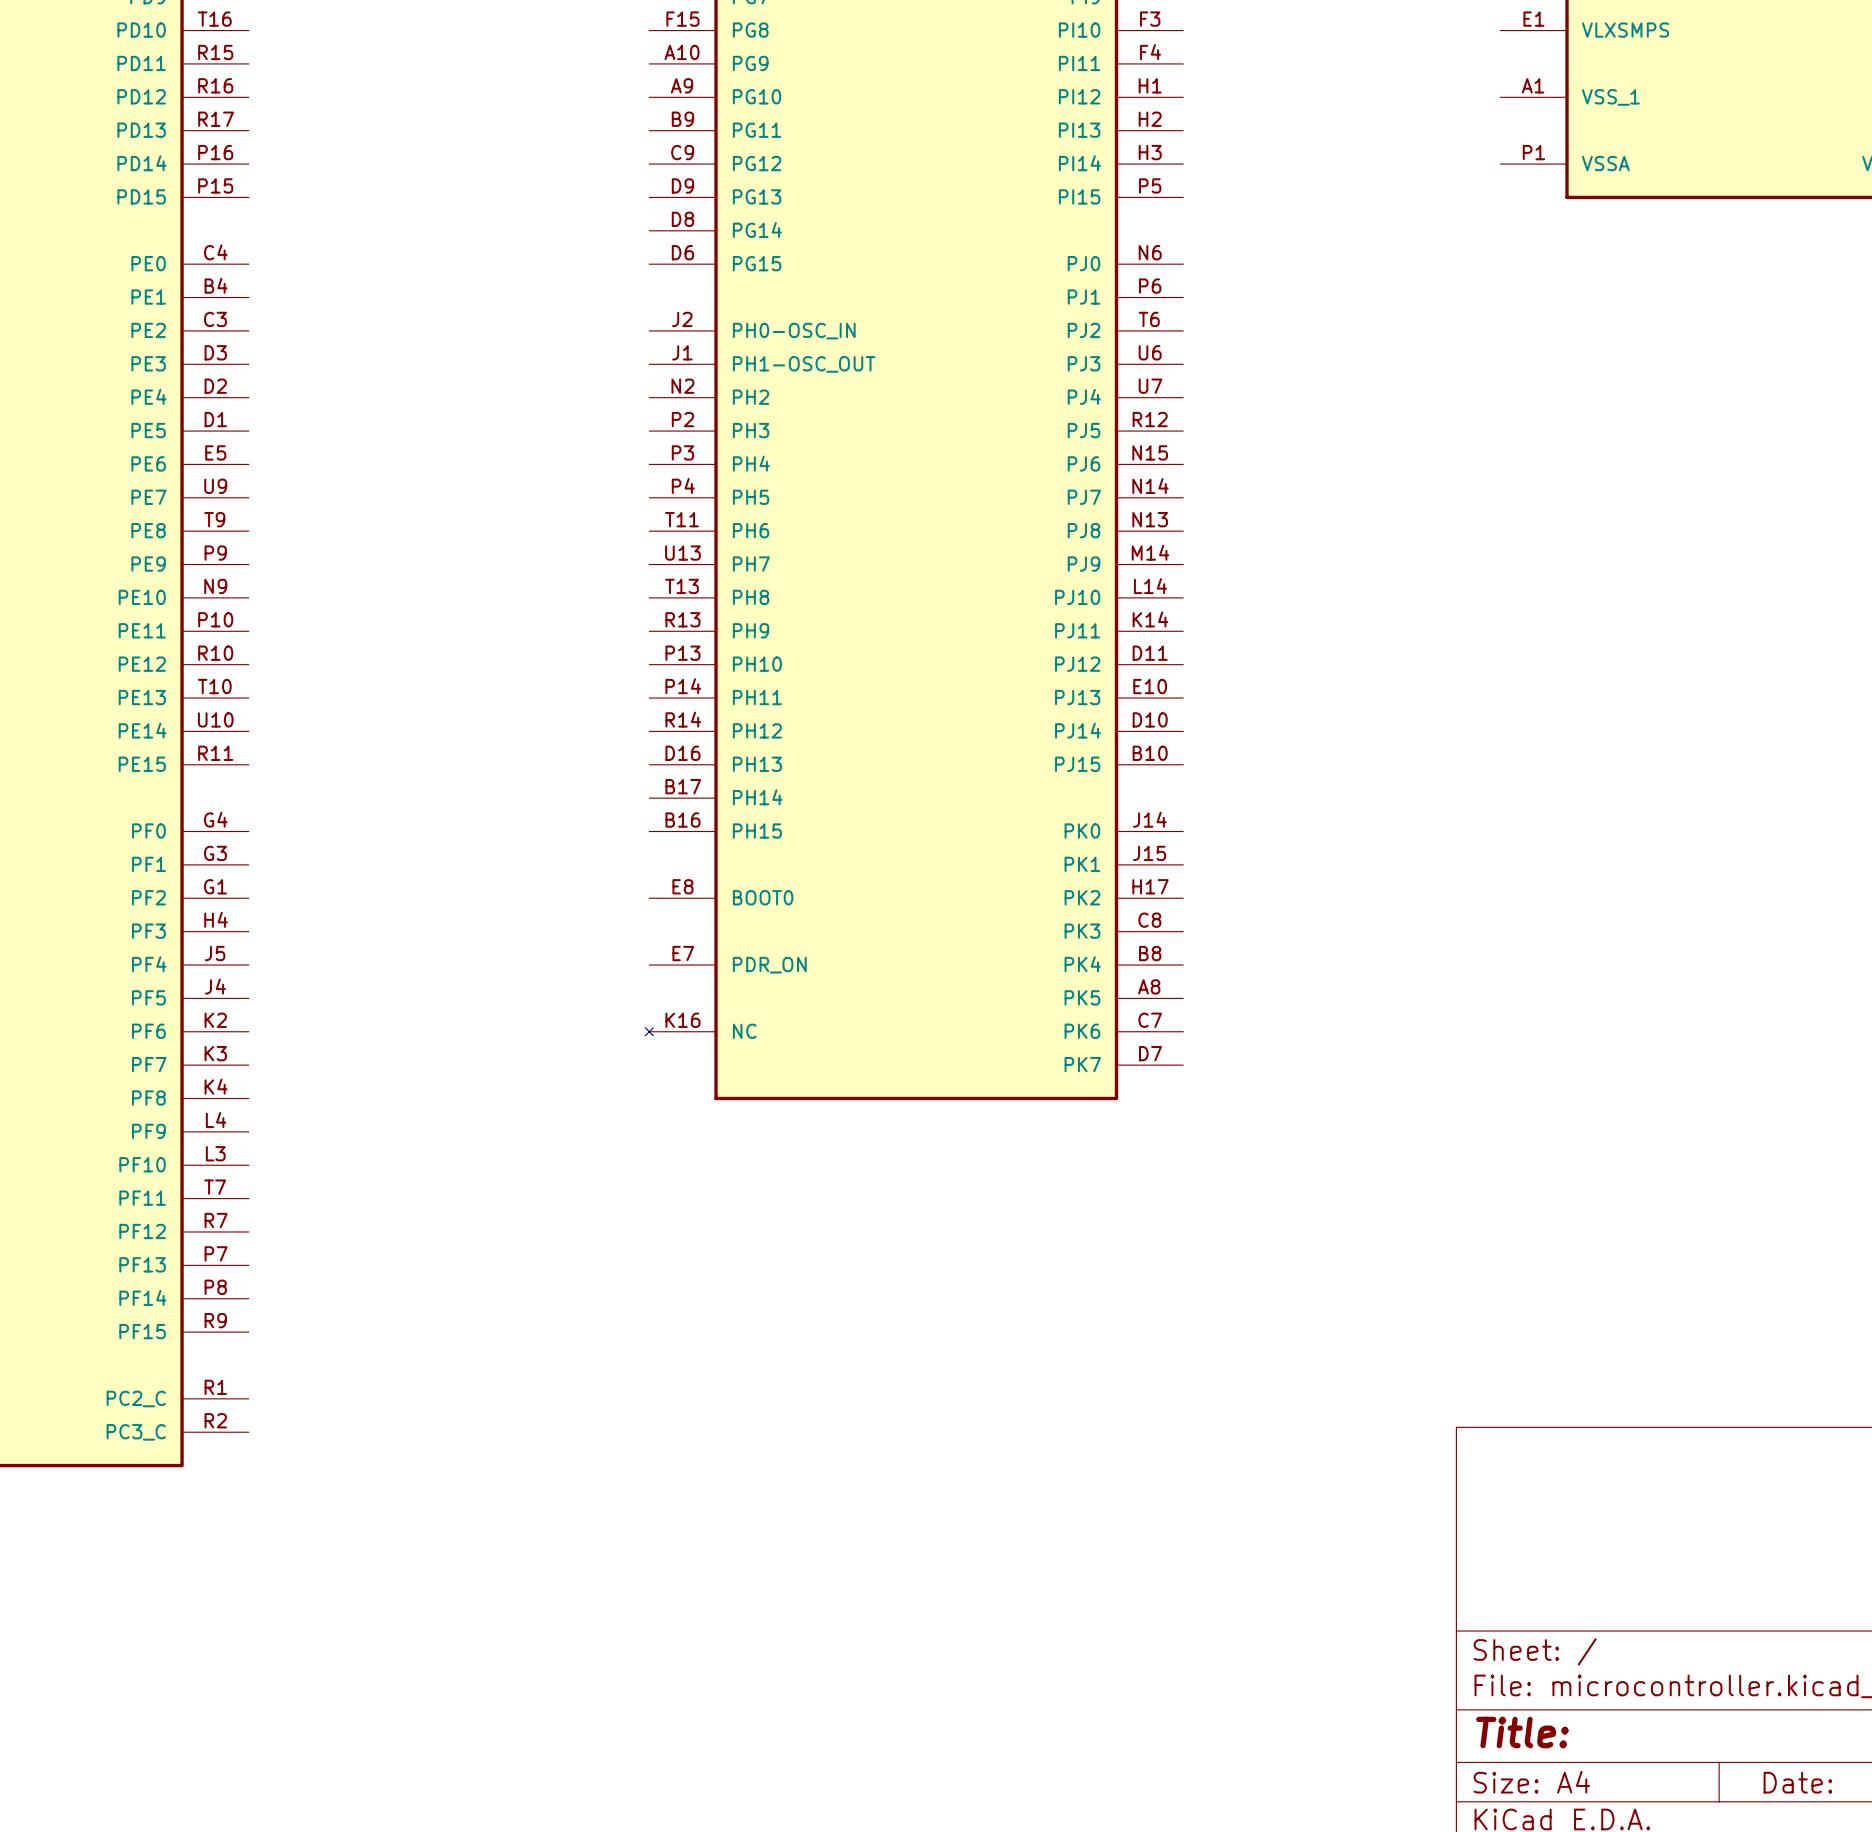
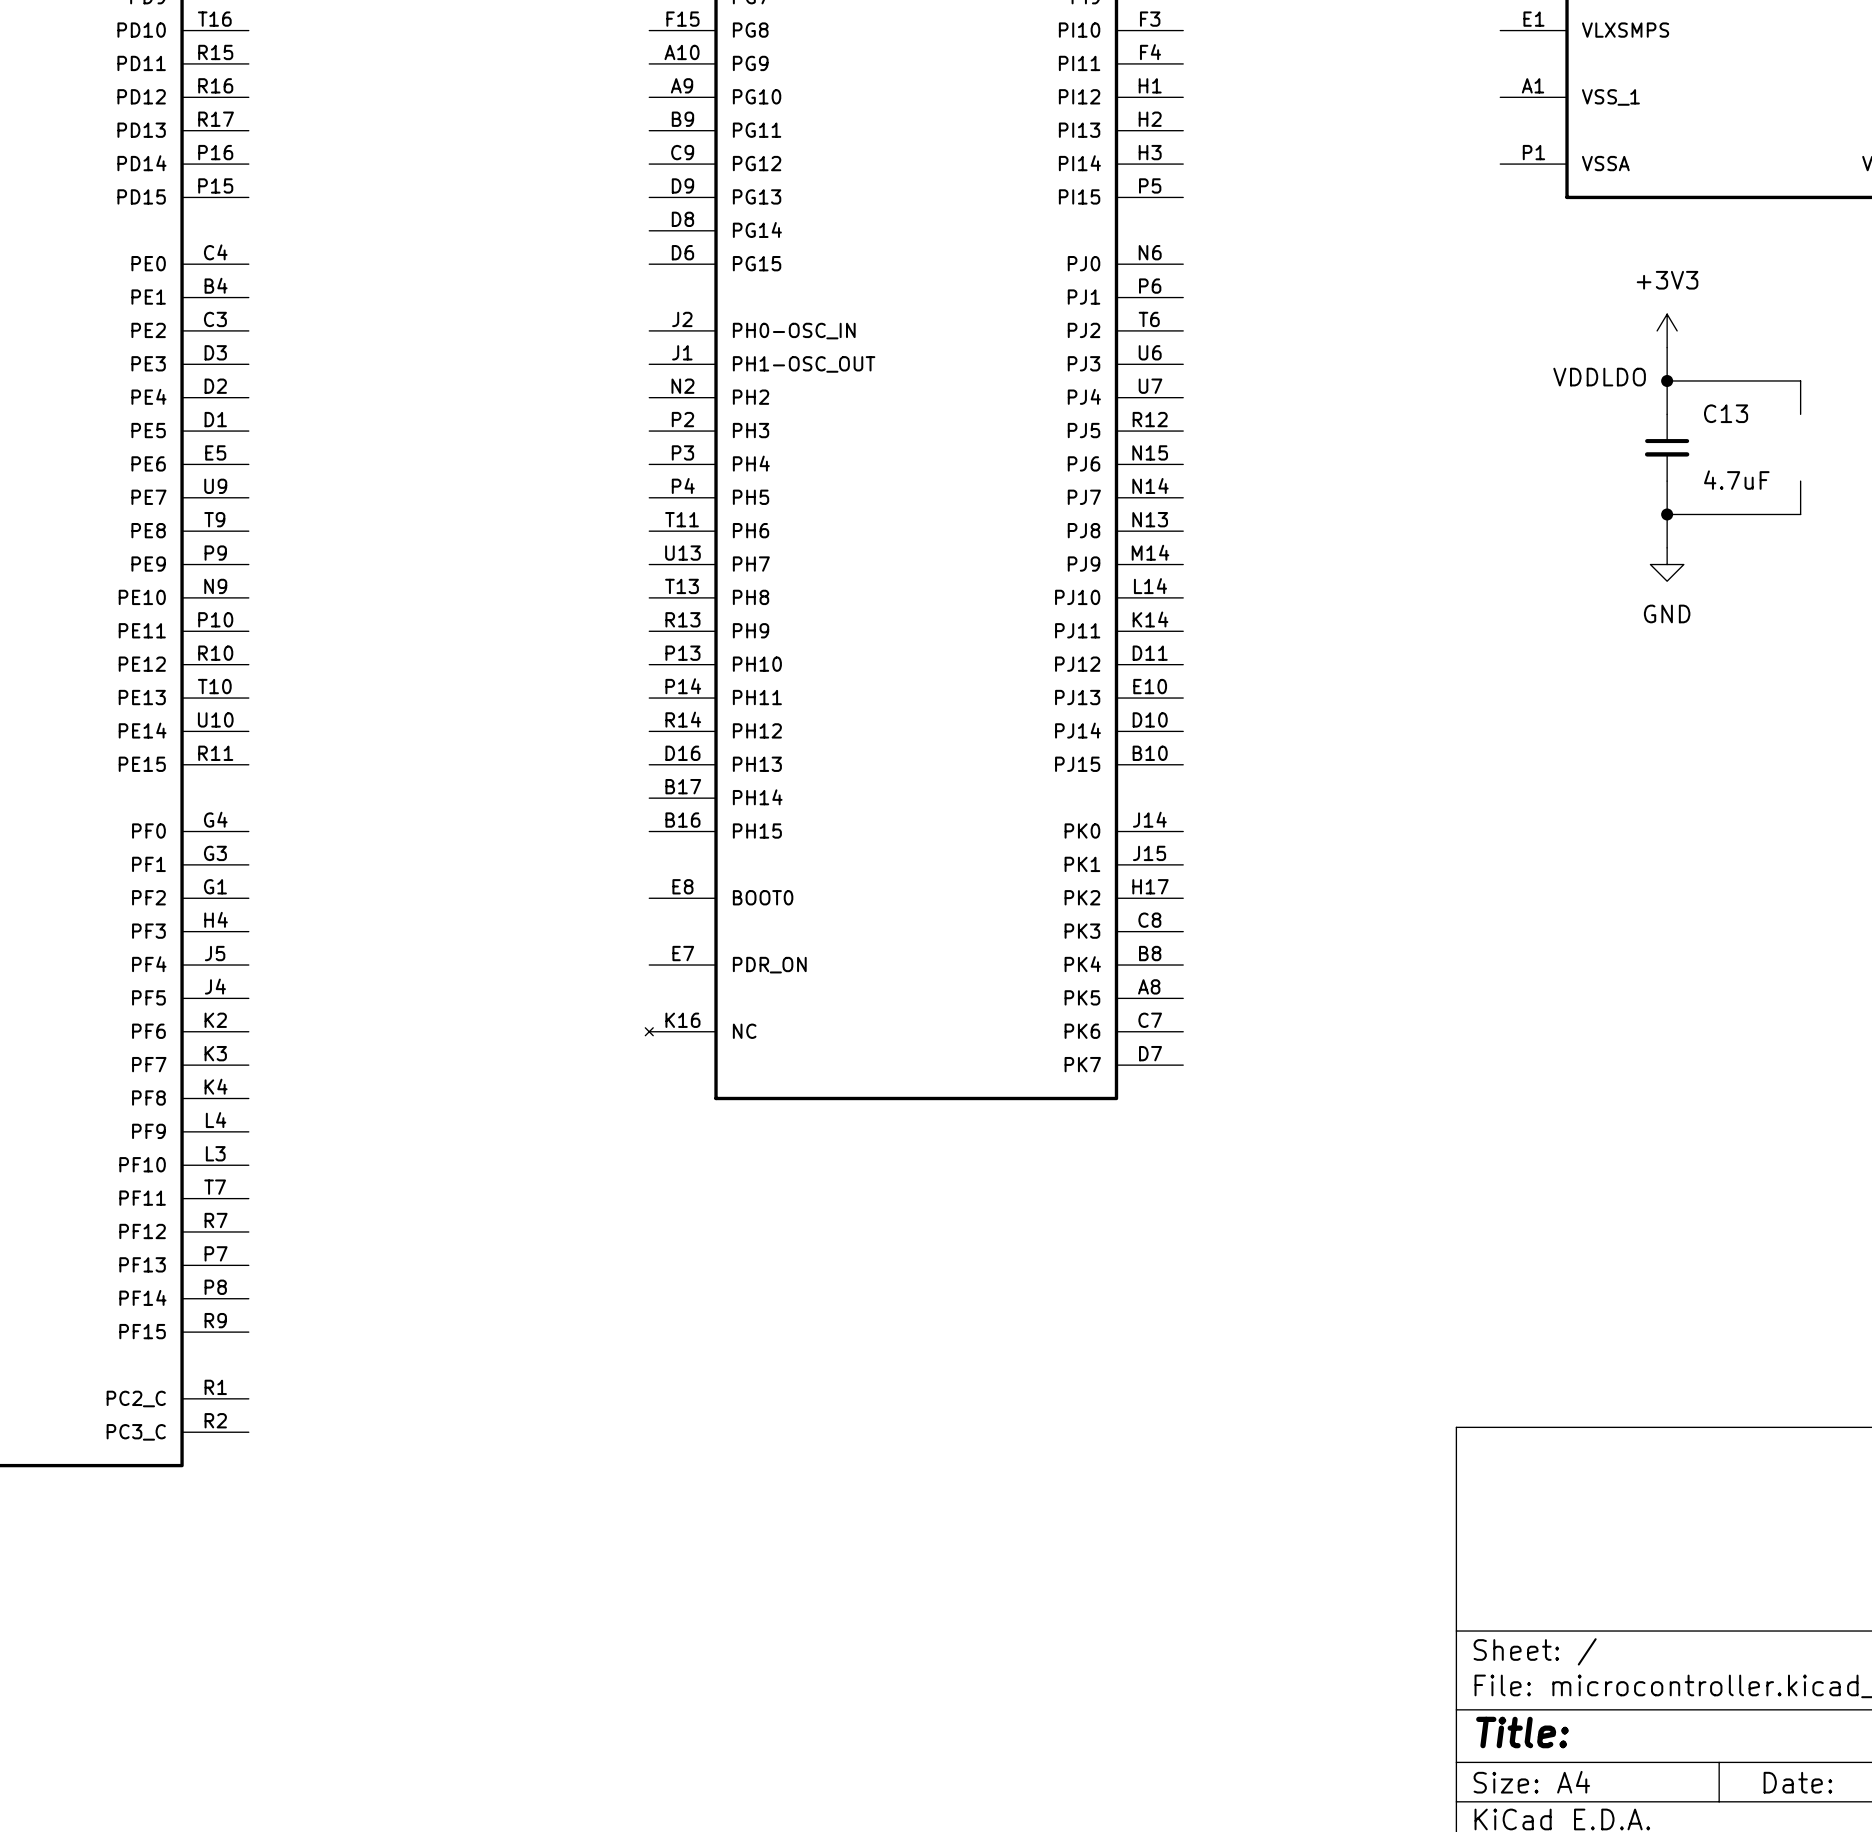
power symbol: none -> +3V3 (1667, 330)
wire: none -> (1667, 347) (1667, 414)
text: none -> VDDLDO (1599, 377)
wire: none -> (1667, 380) (1800, 380) (1800, 414)
junction: none -> (1667, 380)
C13: none -> 4.7uF (1667, 447)
wire: none -> (1667, 481) (1667, 547)
wire: none -> (1800, 481) (1800, 514) (1667, 514)
junction: none -> (1667, 514)
power symbol: none -> GND (1667, 564)

